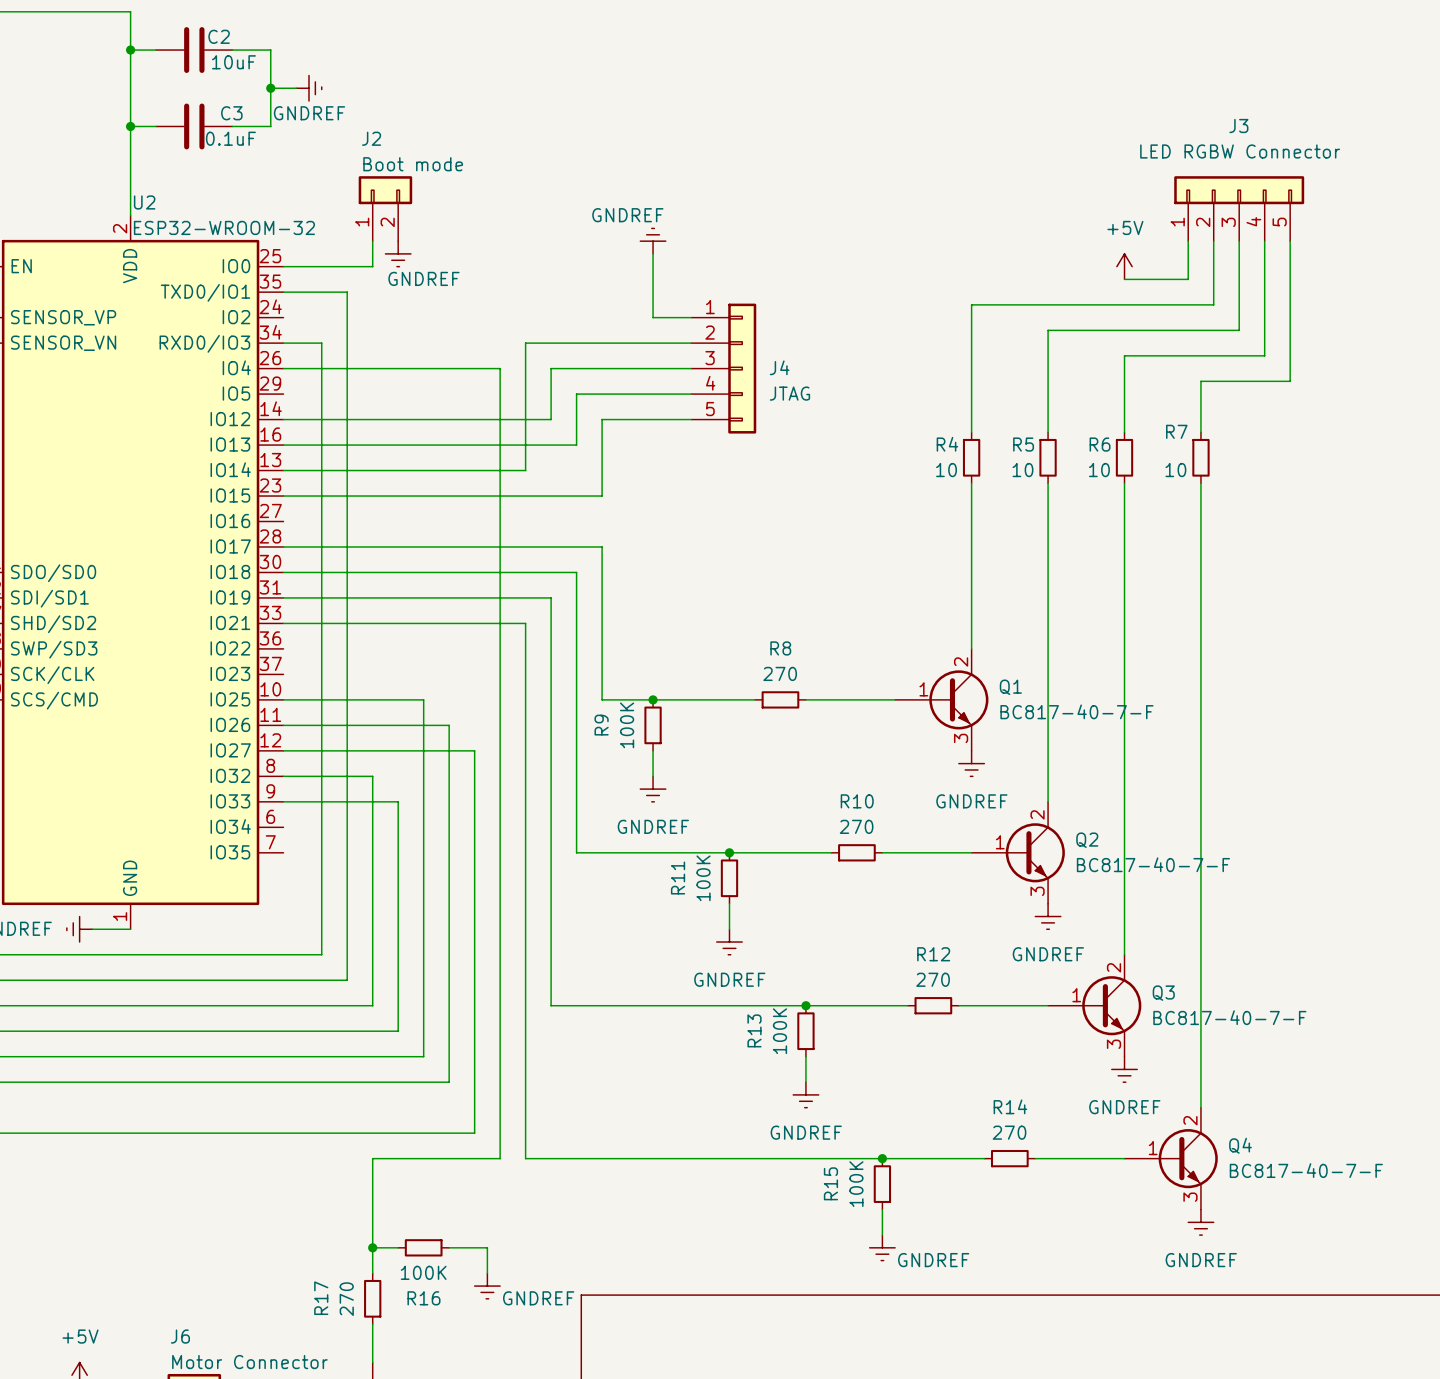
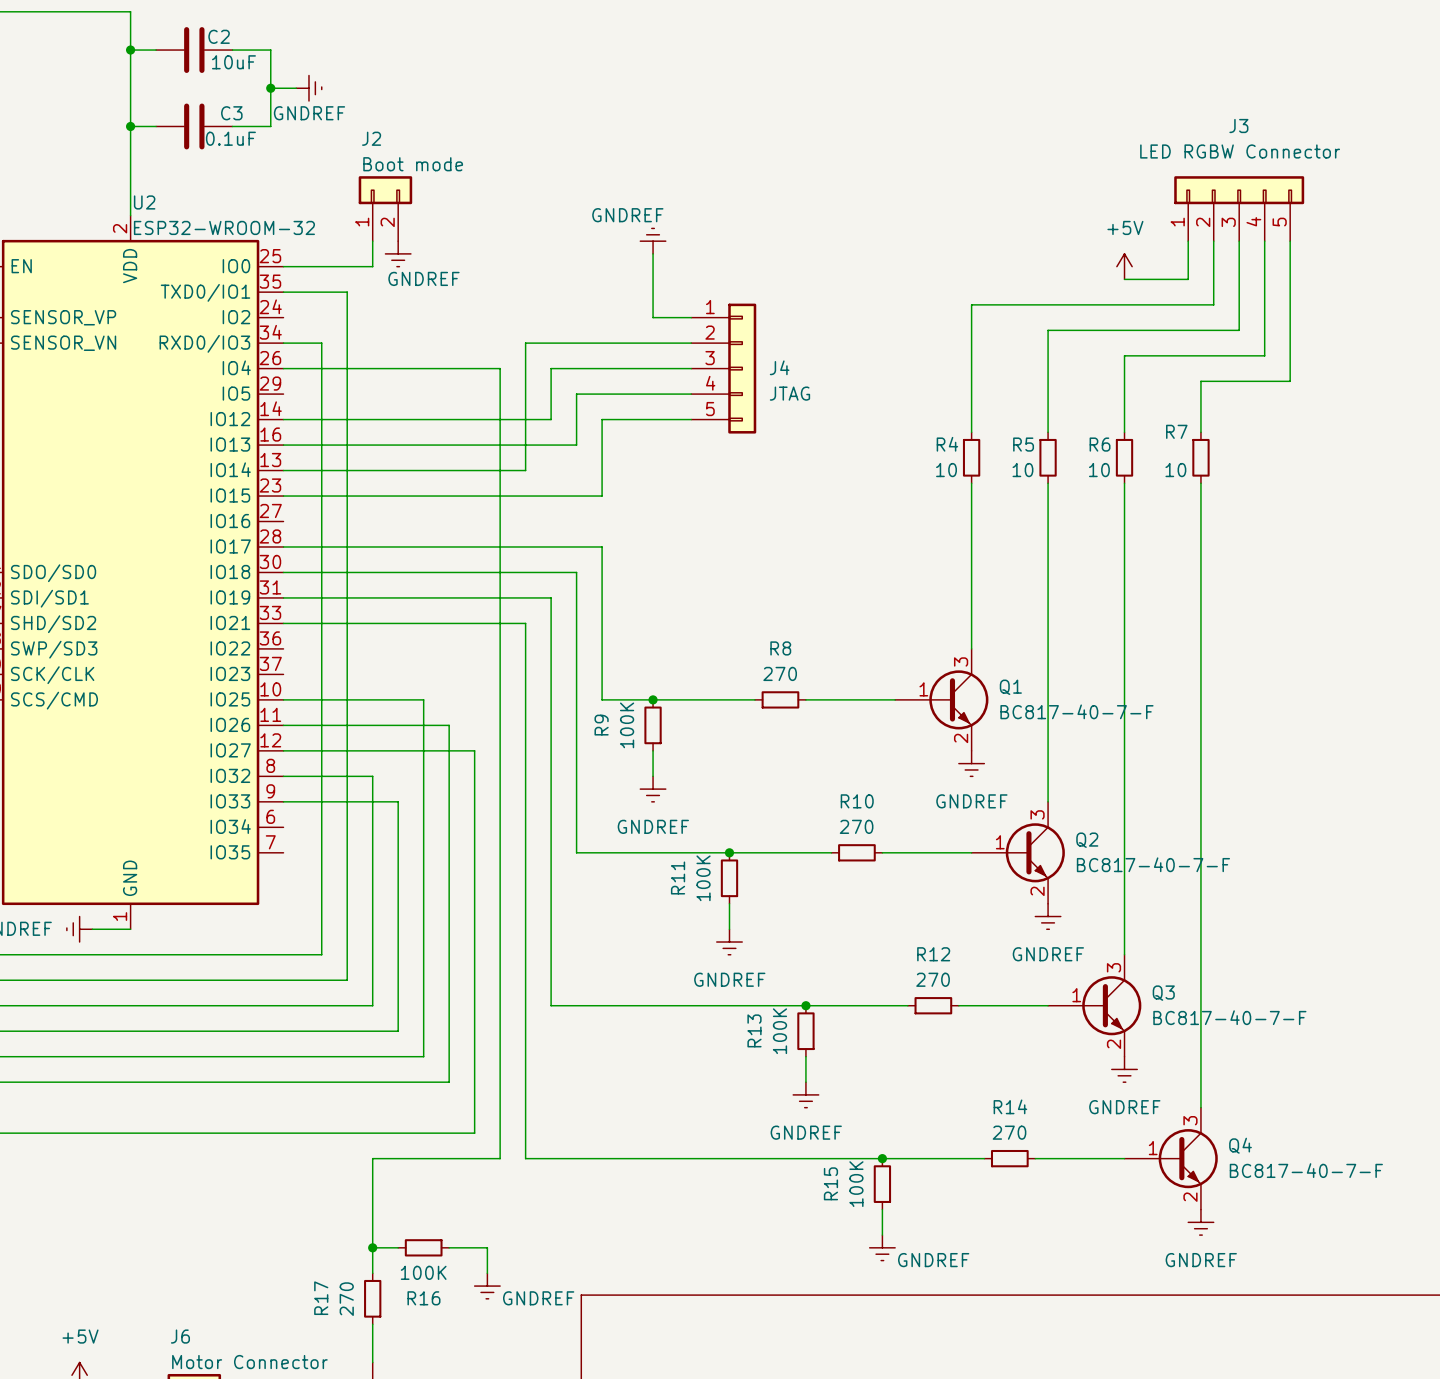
Q1 pin number: 2 (961, 661) -> 3 (961, 661)
Q1 pin number: 3 (961, 738) -> 2 (961, 738)
Q2 pin number: 2 (1037, 814) -> 3 (1037, 814)
Q2 pin number: 3 (1037, 891) -> 2 (1037, 891)
Q3 pin number: 2 (1114, 967) -> 3 (1114, 967)
Q3 pin number: 3 (1114, 1044) -> 2 (1114, 1044)
Q4 pin number: 2 (1190, 1120) -> 3 (1190, 1120)
Q4 pin number: 3 (1190, 1197) -> 2 (1190, 1197)

